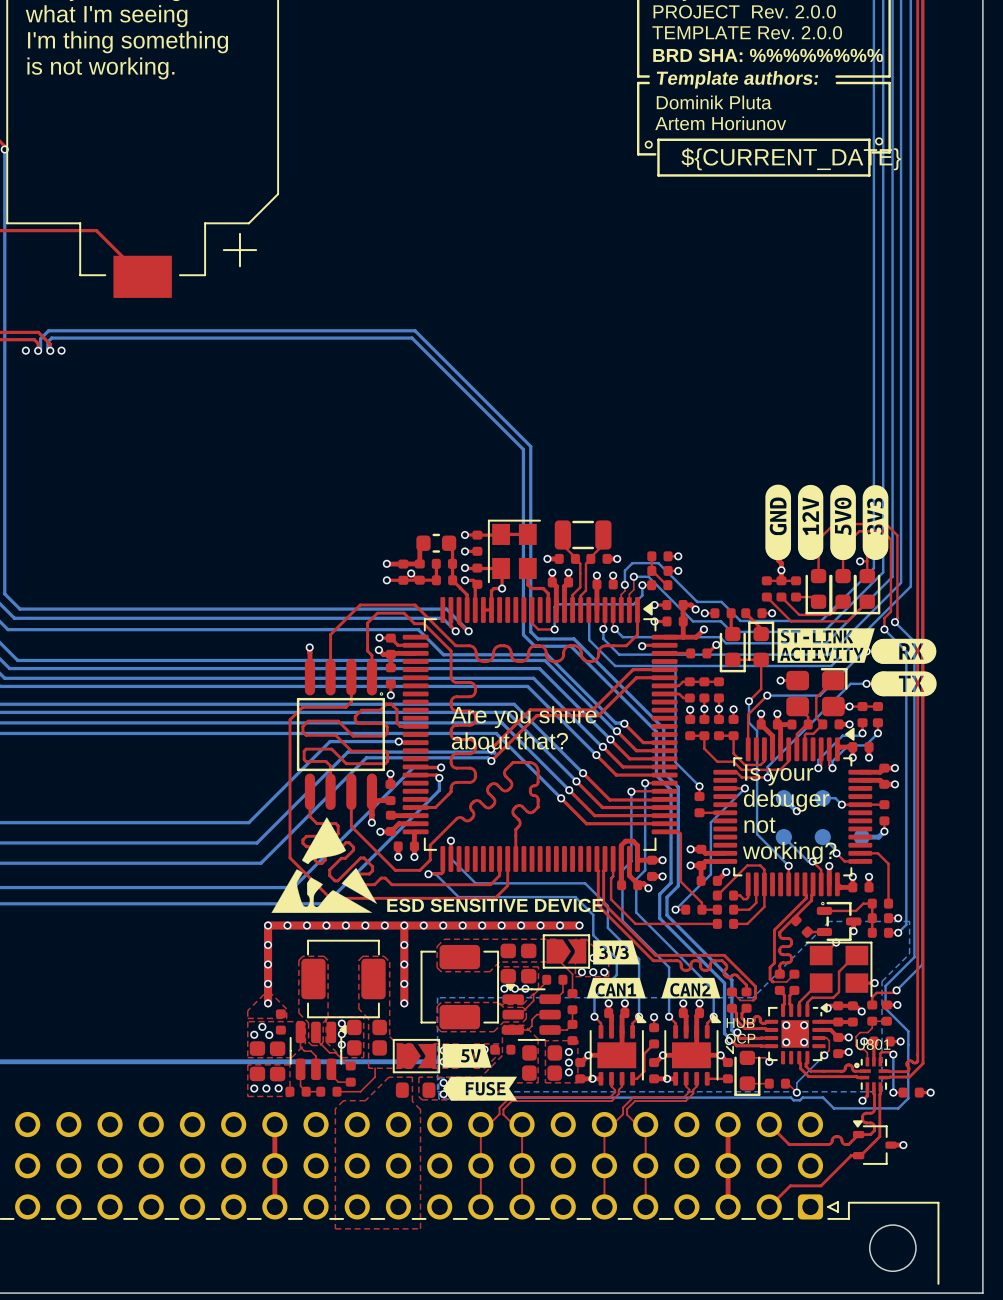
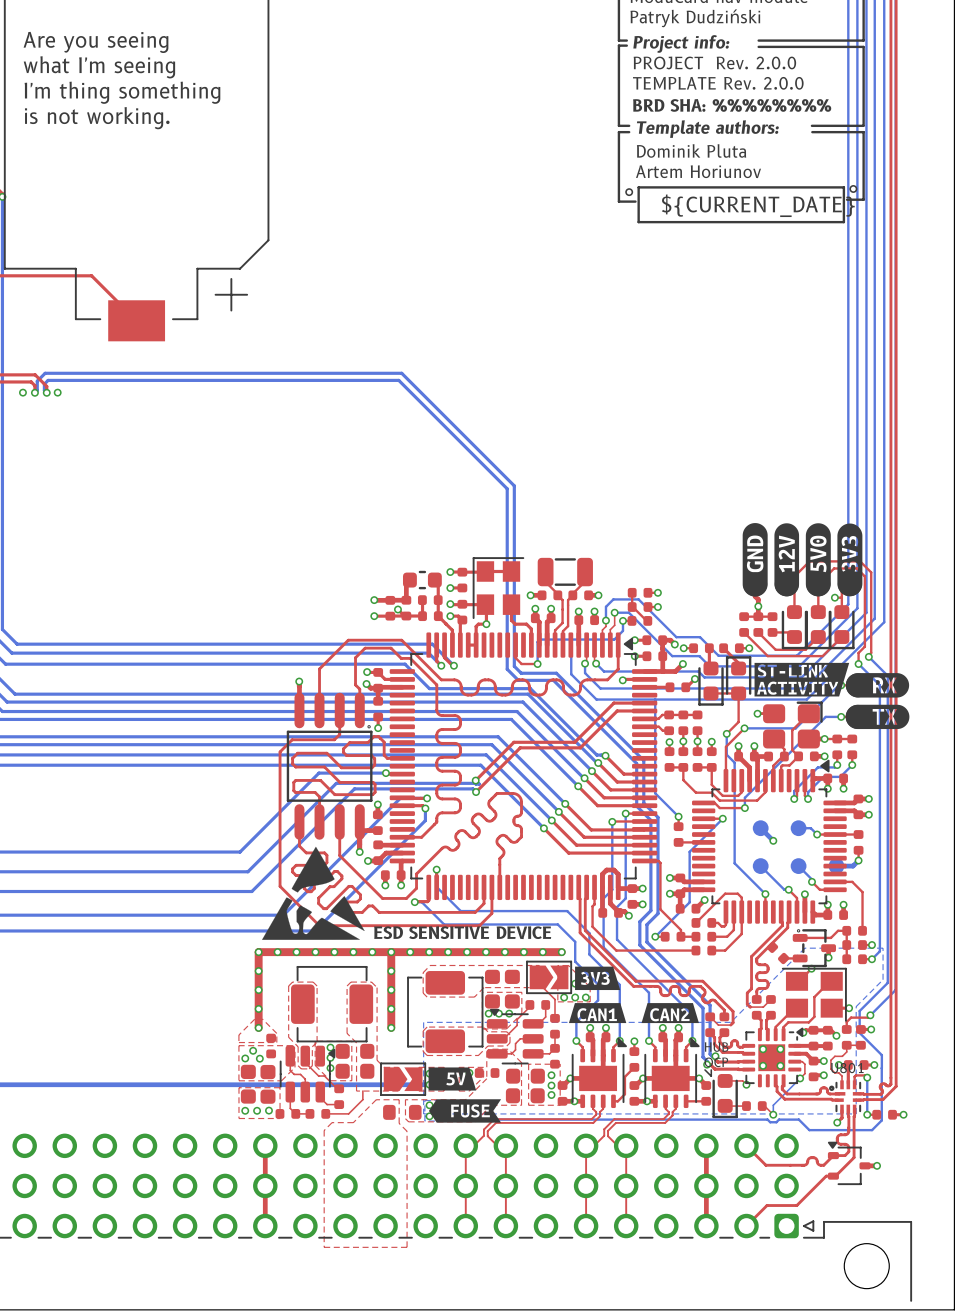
text: Are you shure (523, 717) -> none
text: about that? (509, 740) -> none
text: Is your (779, 774) -> none
text: debuger (786, 800) -> none
text: not (760, 825) -> none
text: working? (789, 852) -> none

